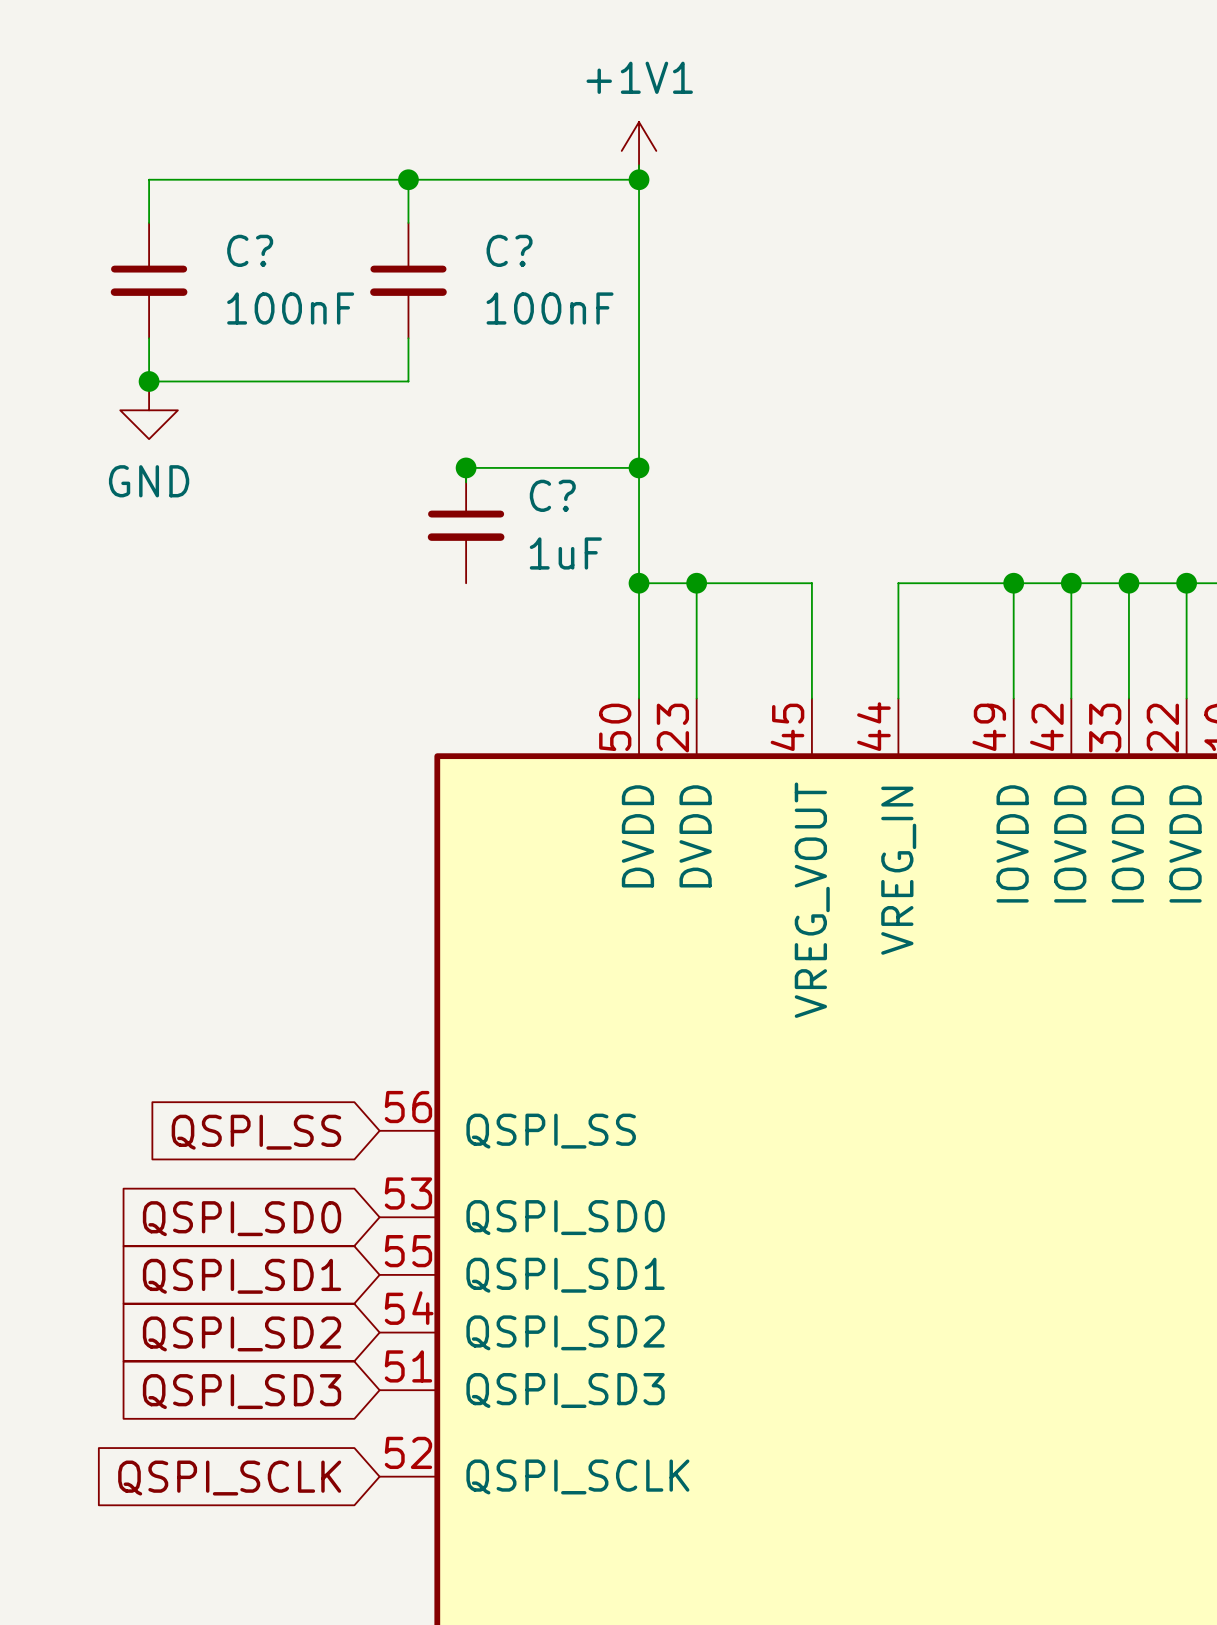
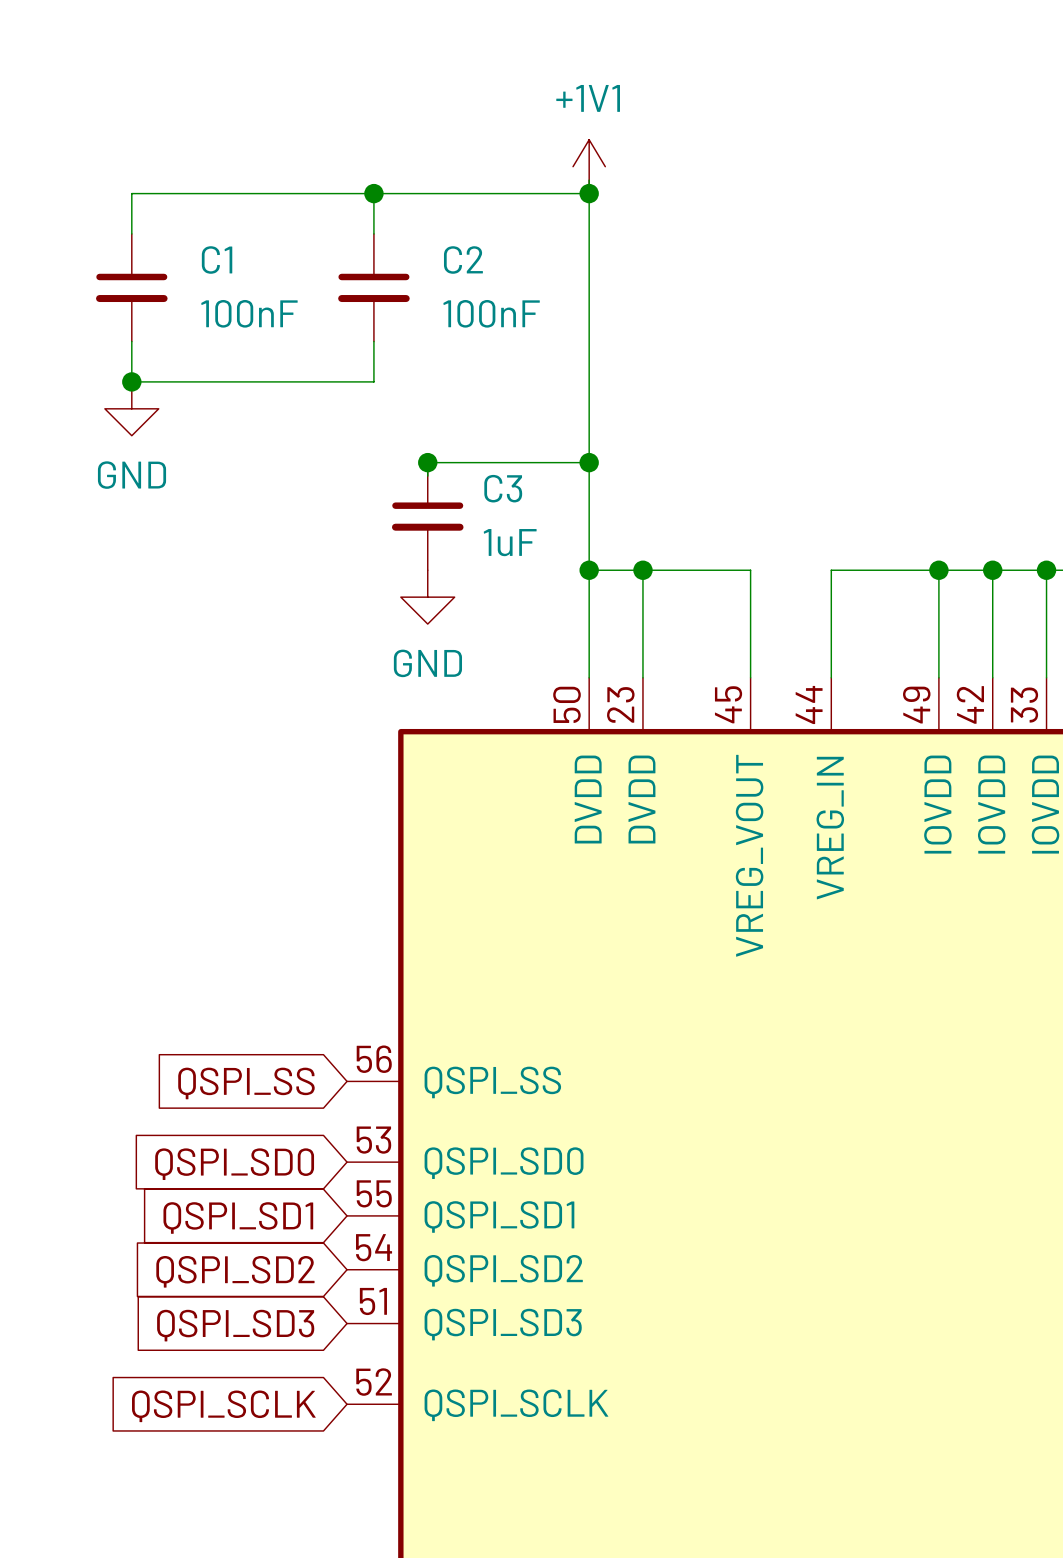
C? name: C? (250, 250) -> C1 (217, 260)
C? name: C? (509, 250) -> C2 (463, 260)
C? name: C? (552, 495) -> C3 (503, 488)
power symbol: none -> GND (427, 597)

